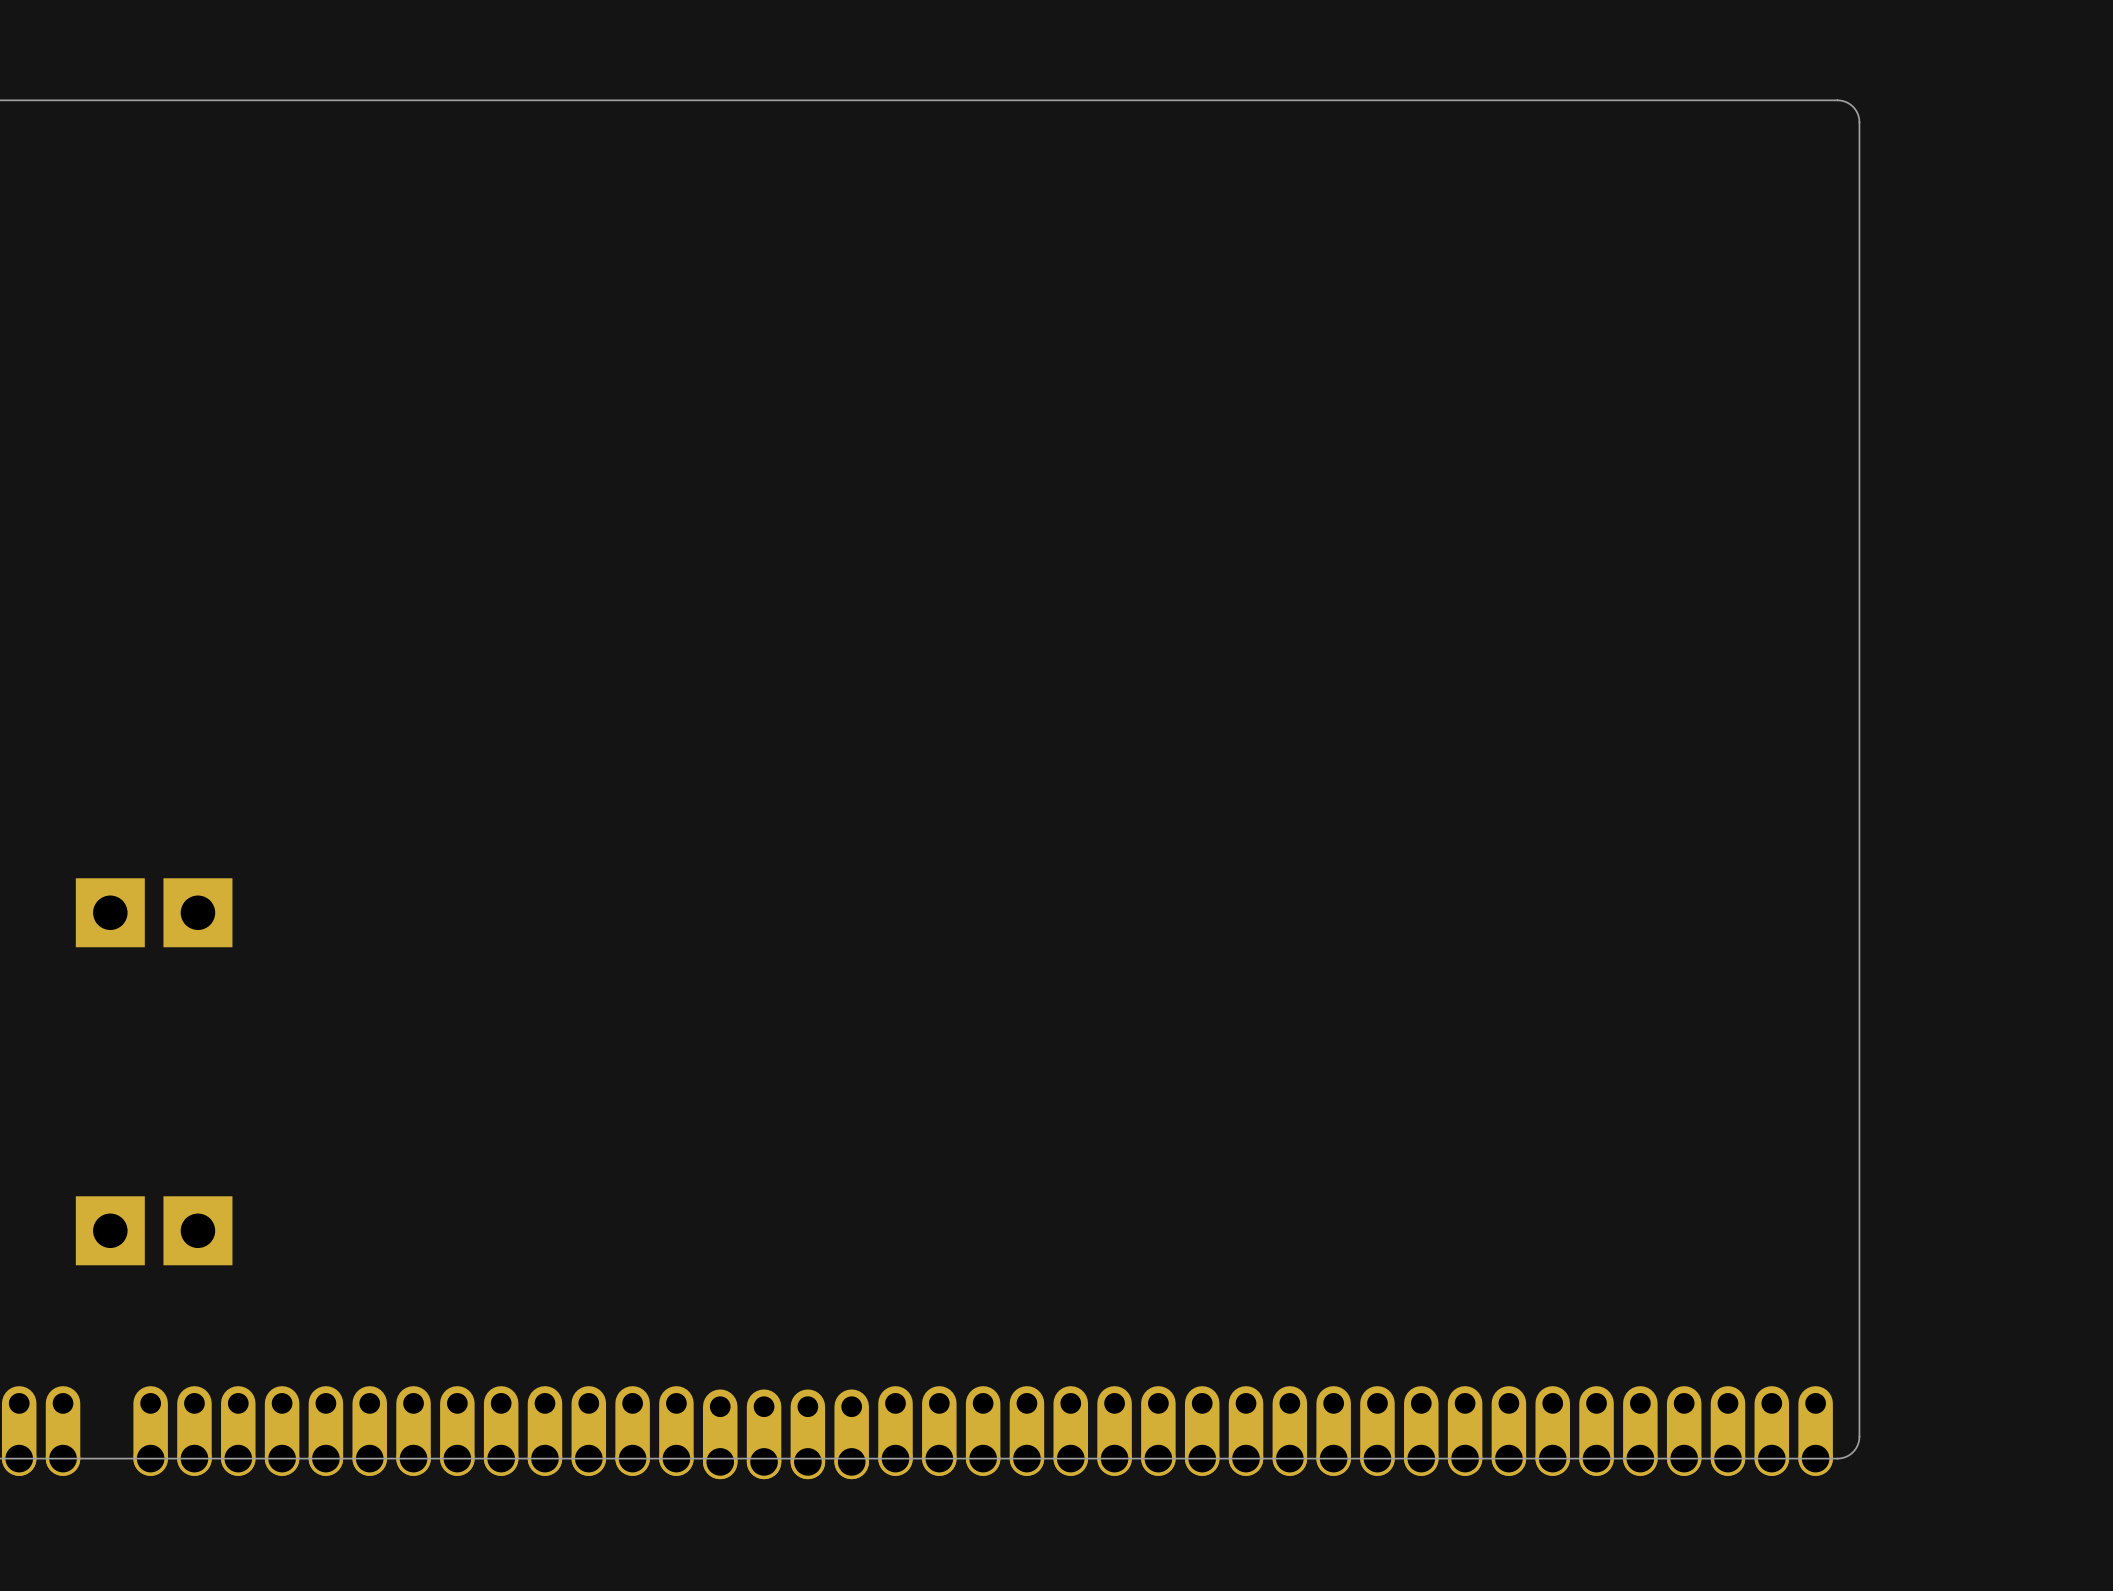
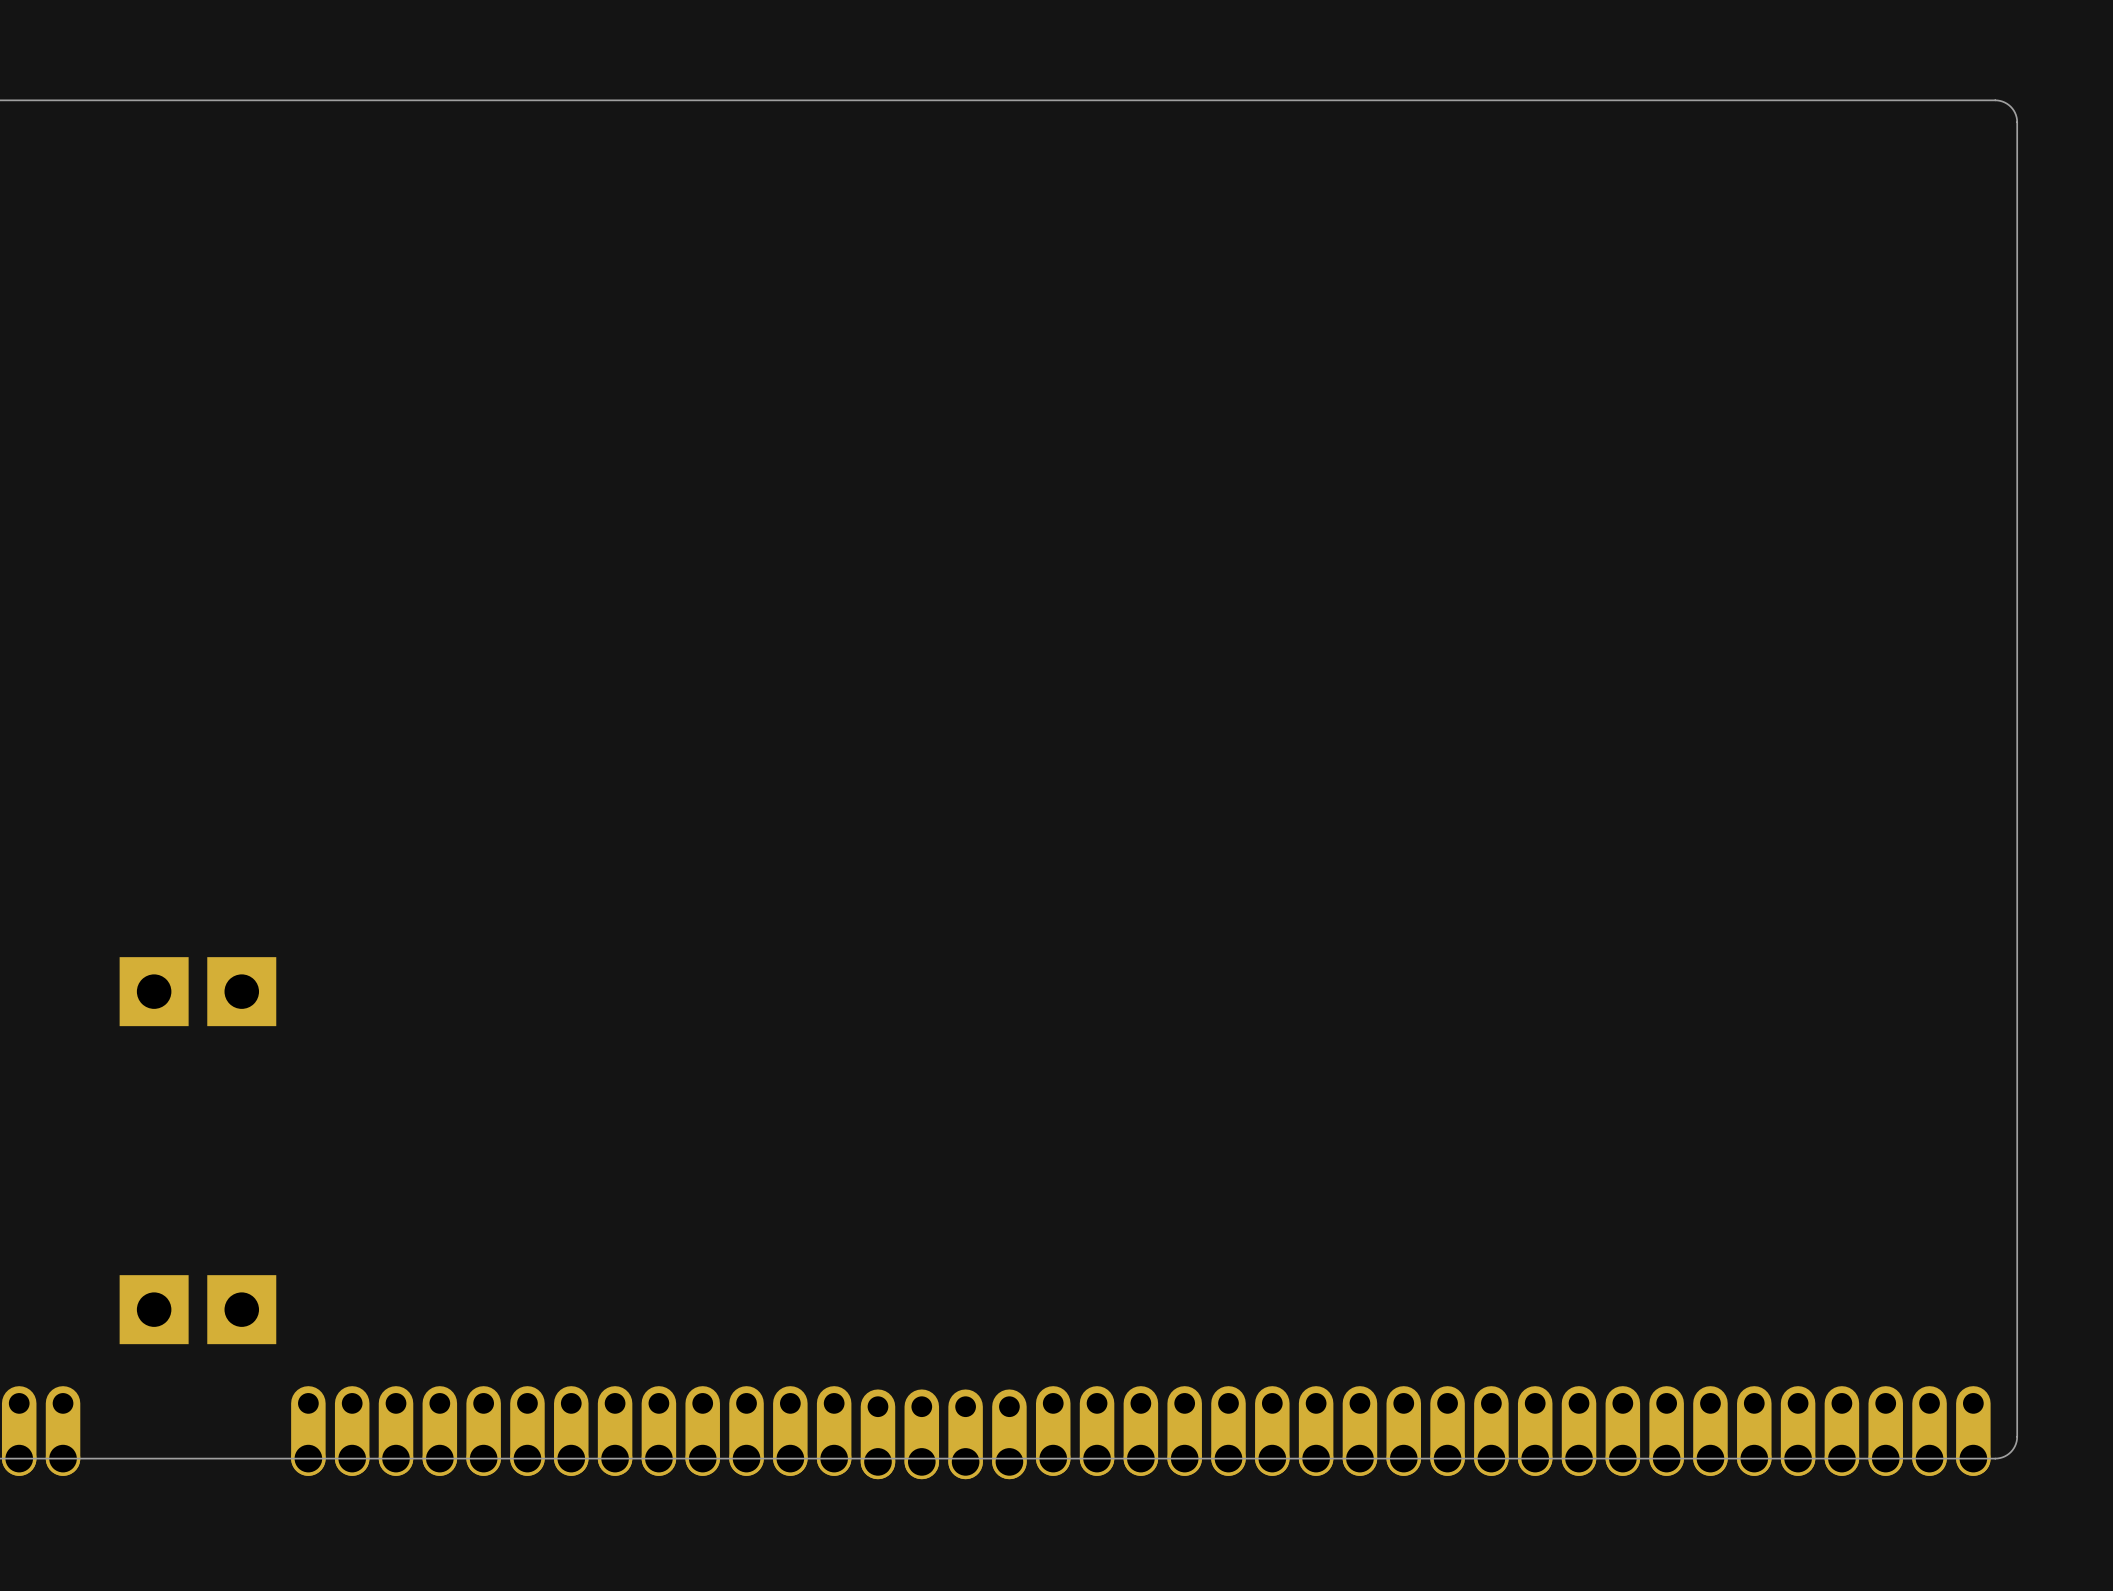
board edge: (1837, 100) (1844, 101) (1853, 106) (1858, 115) (1859, 122) (1859, 1436) (1857, 1446) (1853, 1452) (1847, 1456) (1837, 1458) -> (1837, 100) (1997, 100) (2010, 106) (2015, 115) (2017, 122) (2017, 1439) (2010, 1452) (1997, 1458) (1837, 1458)
part: (110, 912) -> none
part: (197, 912) -> none
part: none -> (154, 991)
part: none -> (241, 991)
part: (110, 1230) -> none
part: (197, 1230) -> none
part: none -> (154, 1309)
part: none -> (241, 1309)
part: (150, 1431) -> none
part: (194, 1431) -> none
part: (238, 1431) -> none
part: (282, 1431) -> none
part: none -> (308, 1431)
part: (325, 1431) -> none
part: none -> (352, 1431)
part: (369, 1431) -> none
part: none -> (396, 1431)
part: (413, 1431) -> none
part: none -> (439, 1431)
part: (457, 1431) -> none
part: none -> (483, 1431)
part: (501, 1431) -> none
part: none -> (527, 1431)
part: (544, 1431) -> none
part: none -> (571, 1431)
part: (588, 1431) -> none
part: none -> (615, 1431)
part: (632, 1431) -> none
part: none -> (658, 1431)
part: (676, 1431) -> none
part: none -> (702, 1431)
part: none -> (746, 1431)
part: none -> (790, 1431)
part: none -> (834, 1431)
part: (895, 1431) -> none
part: (939, 1431) -> none
part: (983, 1431) -> none
part: (1026, 1431) -> none
part: none -> (1053, 1431)
part: (1070, 1431) -> none
part: none -> (1097, 1431)
part: (1114, 1431) -> none
part: none -> (1140, 1431)
part: (1158, 1431) -> none
part: none -> (1184, 1431)
part: (1202, 1431) -> none
part: none -> (1228, 1431)
part: (1246, 1431) -> none
part: none -> (1272, 1431)
part: (1289, 1431) -> none
part: none -> (1316, 1431)
part: (1333, 1431) -> none
part: none -> (1359, 1431)
part: (1377, 1431) -> none
part: none -> (1403, 1431)
part: (1421, 1431) -> none
part: none -> (1447, 1431)
part: (1465, 1431) -> none
part: none -> (1491, 1431)
part: (1508, 1431) -> none
part: none -> (1535, 1431)
part: (1552, 1431) -> none
part: none -> (1579, 1431)
part: (1596, 1431) -> none
part: none -> (1622, 1431)
part: (1640, 1431) -> none
part: none -> (1666, 1431)
part: (1684, 1431) -> none
part: none -> (1710, 1431)
part: (1727, 1431) -> none
part: none -> (1754, 1431)
part: (1771, 1431) -> none
part: none -> (1798, 1431)
part: (1815, 1431) -> none
part: none -> (1841, 1431)
part: none -> (1885, 1431)
part: none -> (1929, 1431)
part: none -> (1973, 1431)
part: (720, 1434) -> none
part: (764, 1434) -> none
part: (807, 1434) -> none
part: (851, 1434) -> none
part: none -> (877, 1434)
part: none -> (921, 1434)
part: none -> (965, 1434)
part: none -> (1009, 1434)

